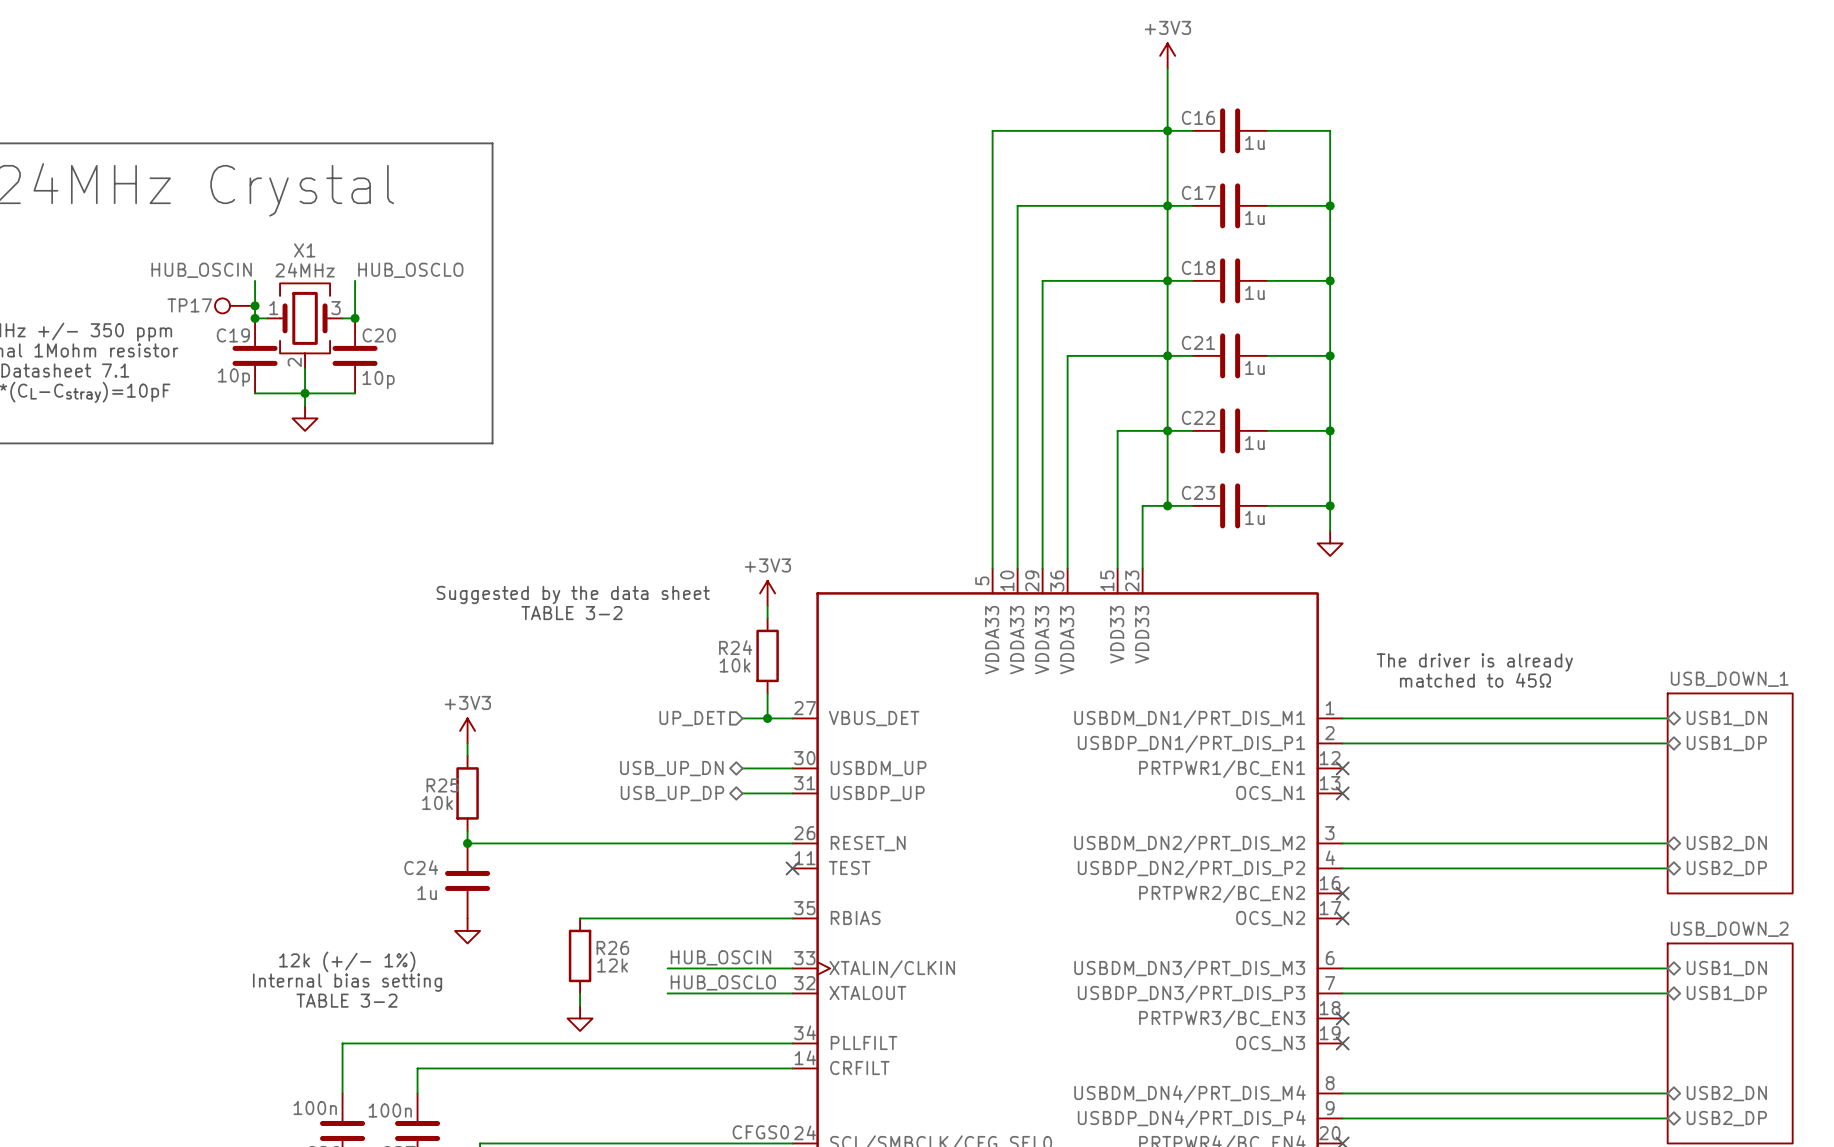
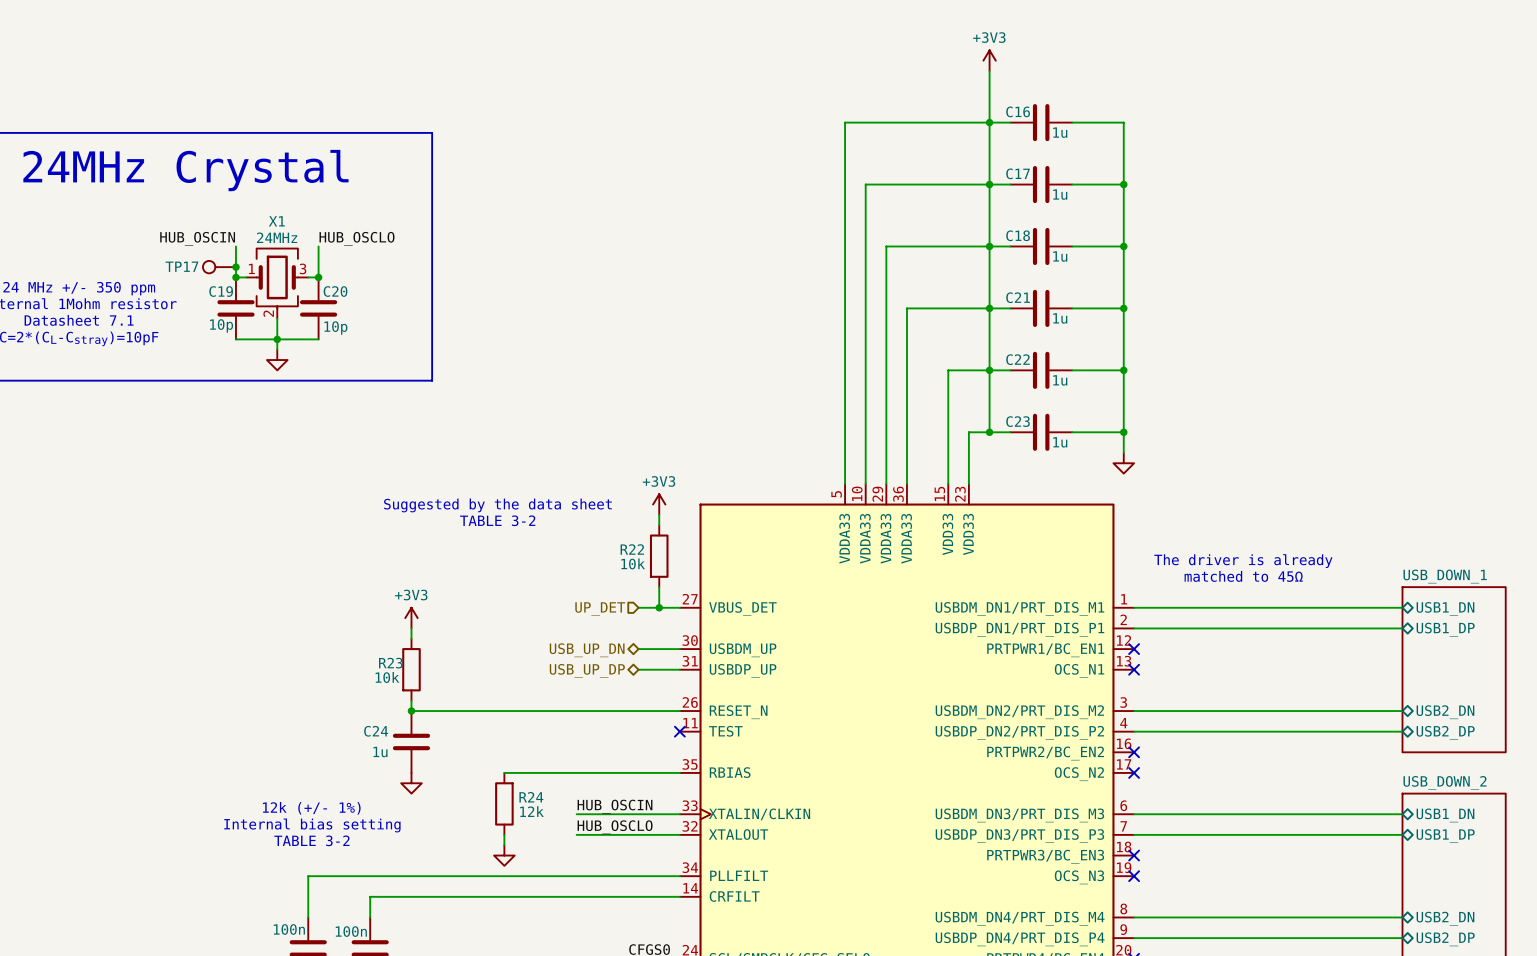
R24 name: R24 (735, 647) -> R22 (632, 549)
R25 name: R25 (442, 785) -> R23 (390, 663)
R26 name: R26 (612, 947) -> R24 (531, 797)

